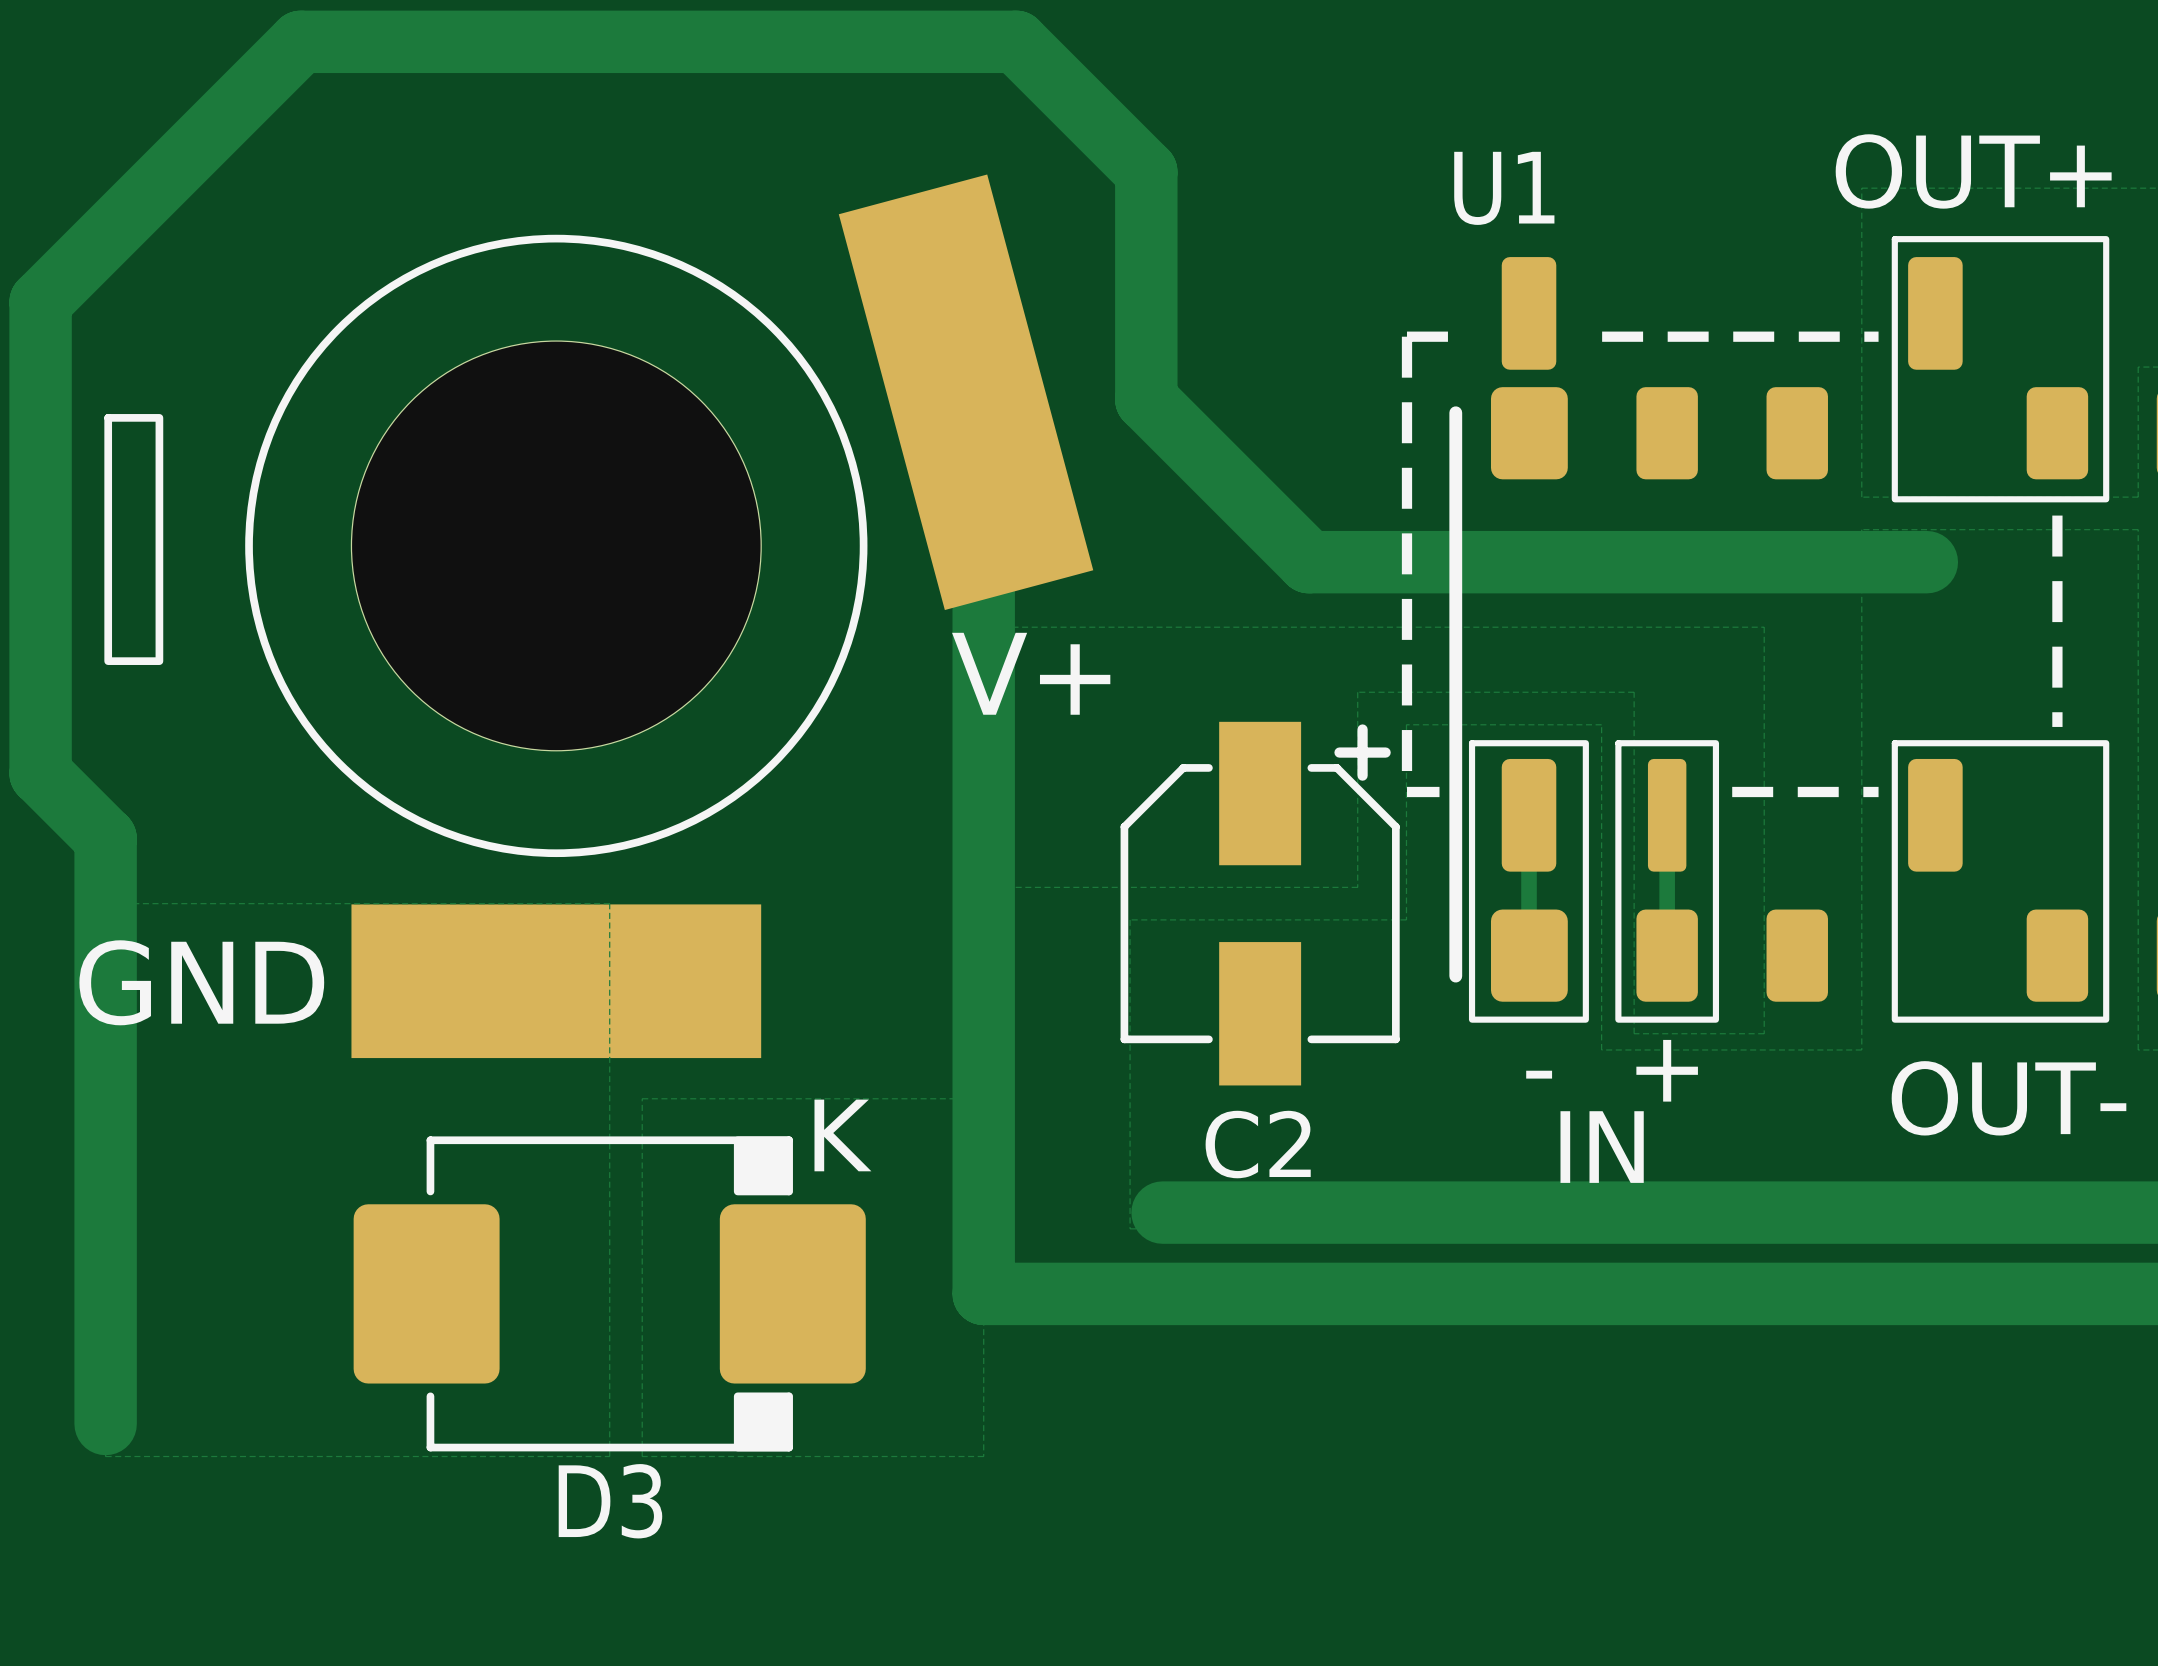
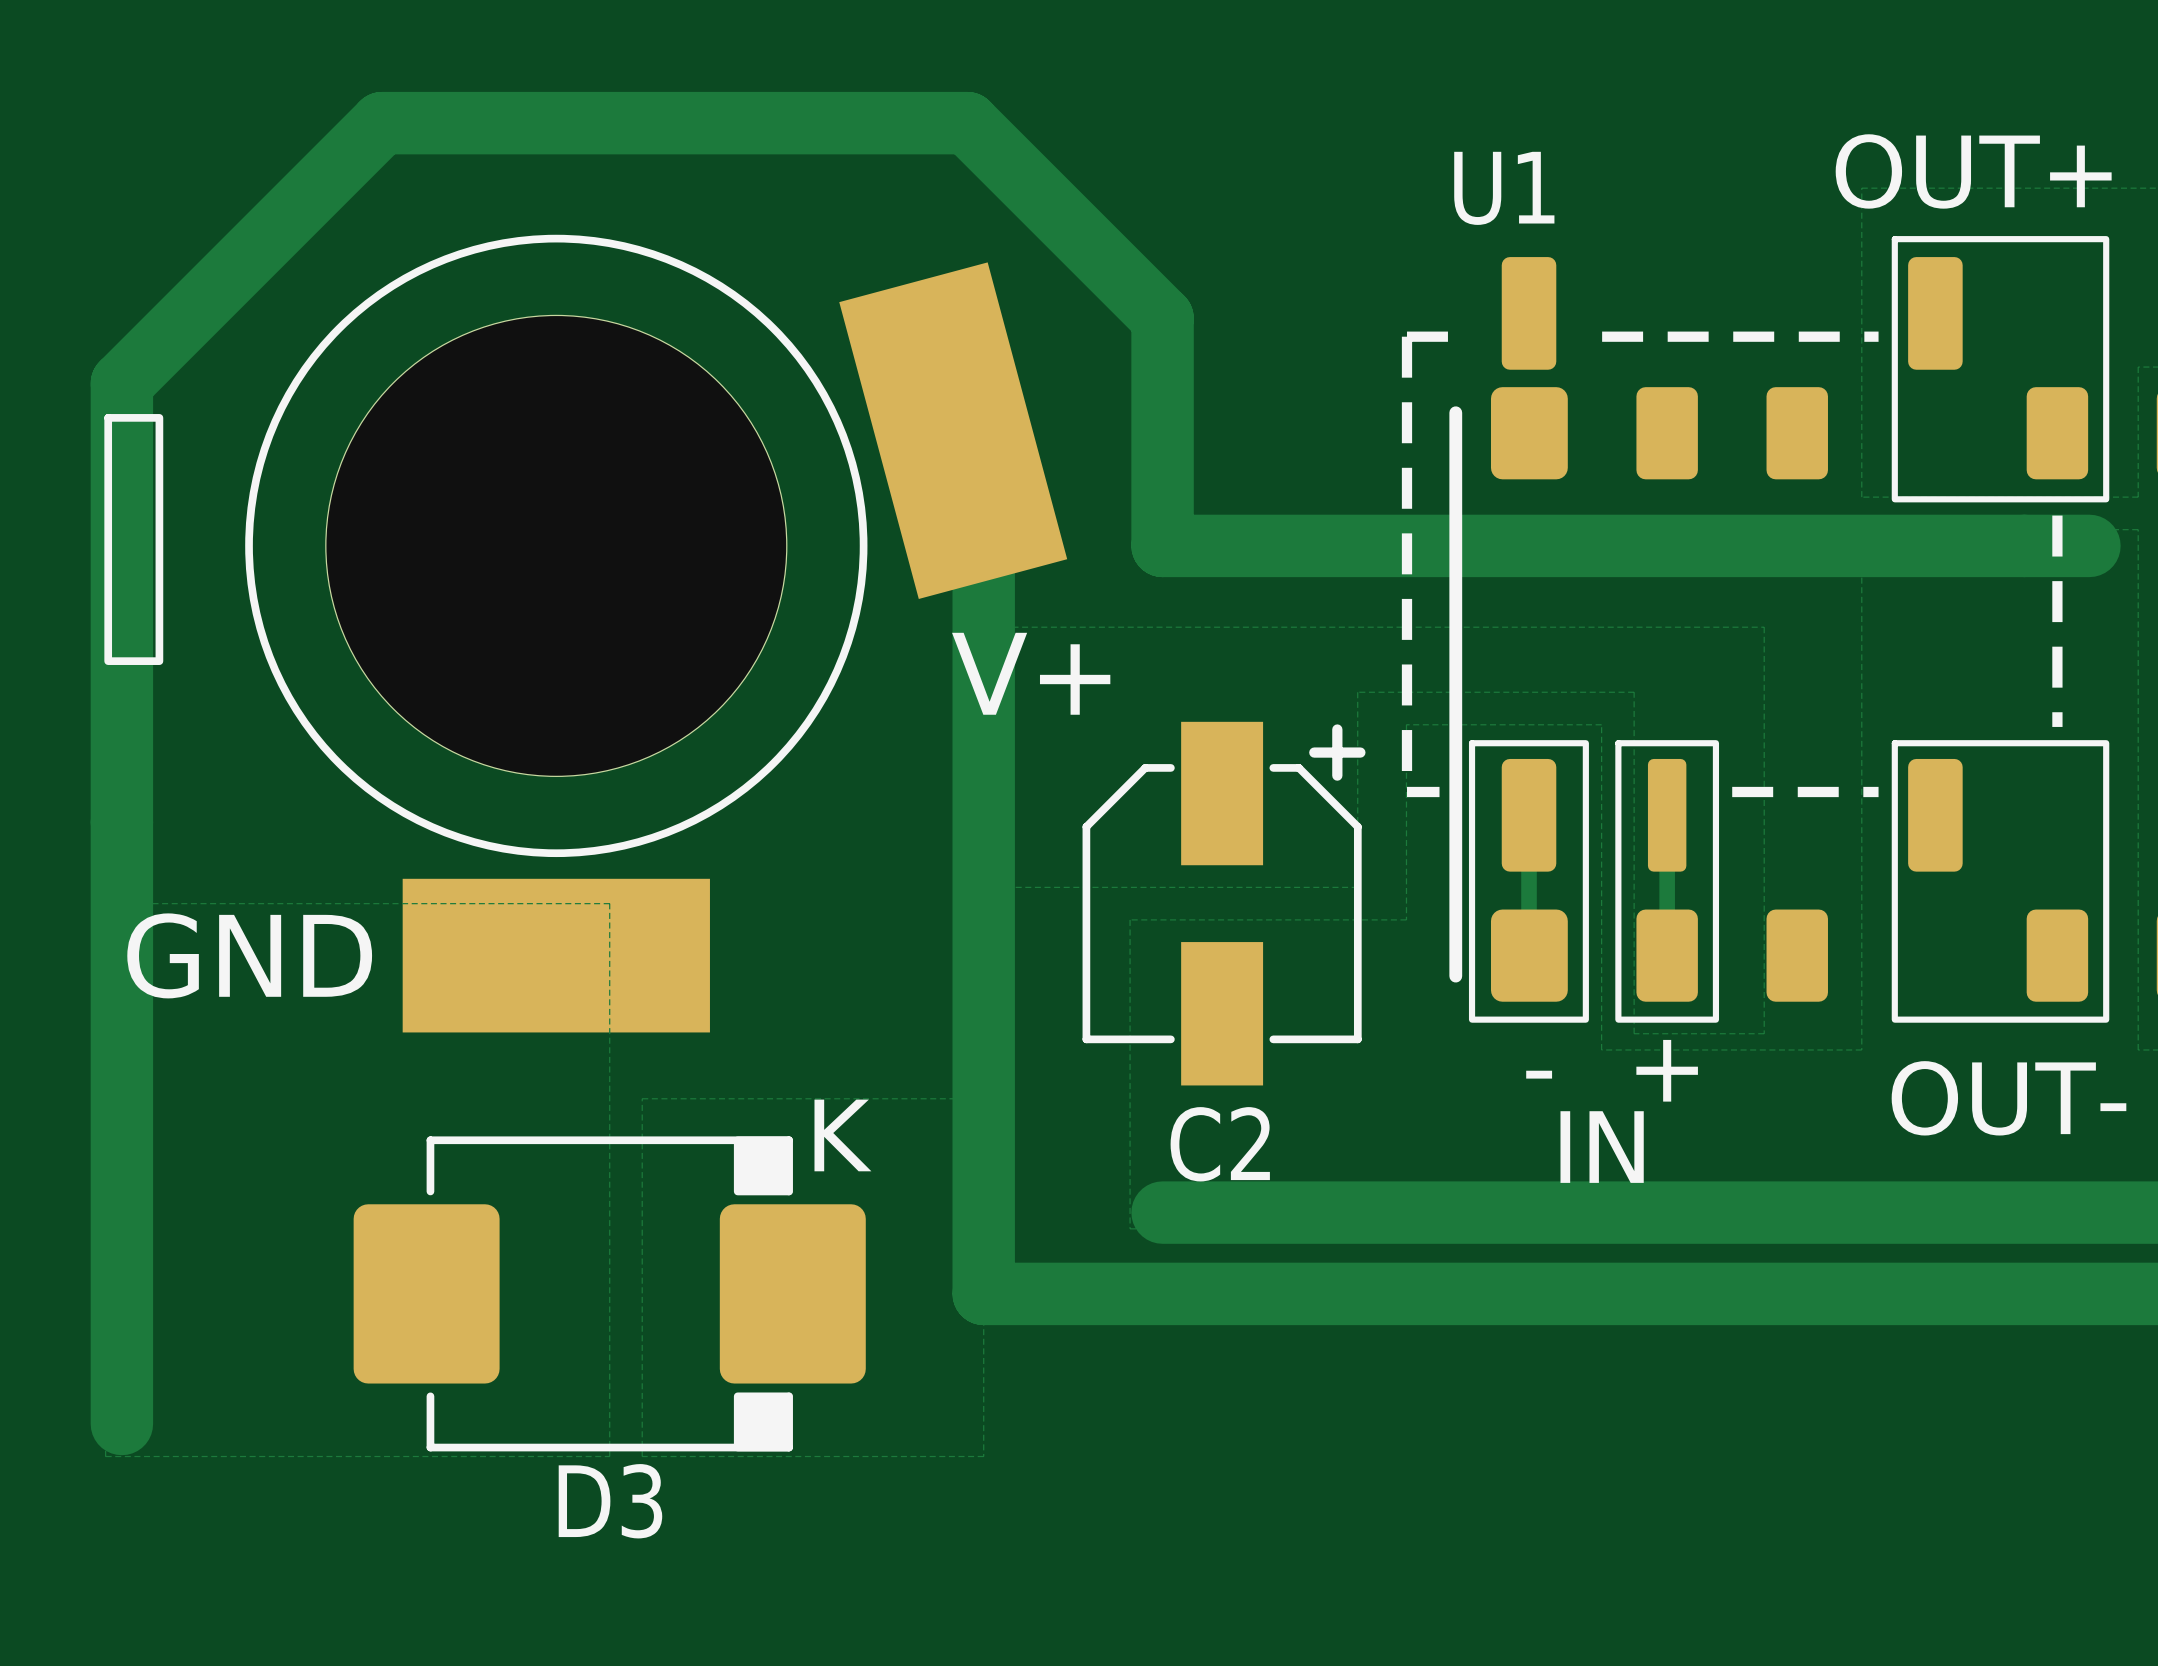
part footprint: [104, 174, 1094, 1059] -> [104, 234, 1068, 1033]
track: none -> (2089, 545) (1162, 545) (1162, 318) (967, 123) (382, 123) (121, 383) (121, 1423)
track: (1926, 562) (1308, 562) (1146, 399) (1146, 171) (1016, 41) (300, 41) (40, 302) (40, 773) (105, 838) (105, 1423) -> none
C2 footprint: [1120, 721, 1400, 1086] -> [1082, 721, 1366, 1086]
C2 name position: C2 (1258, 1144) -> C2 (1220, 1144)

